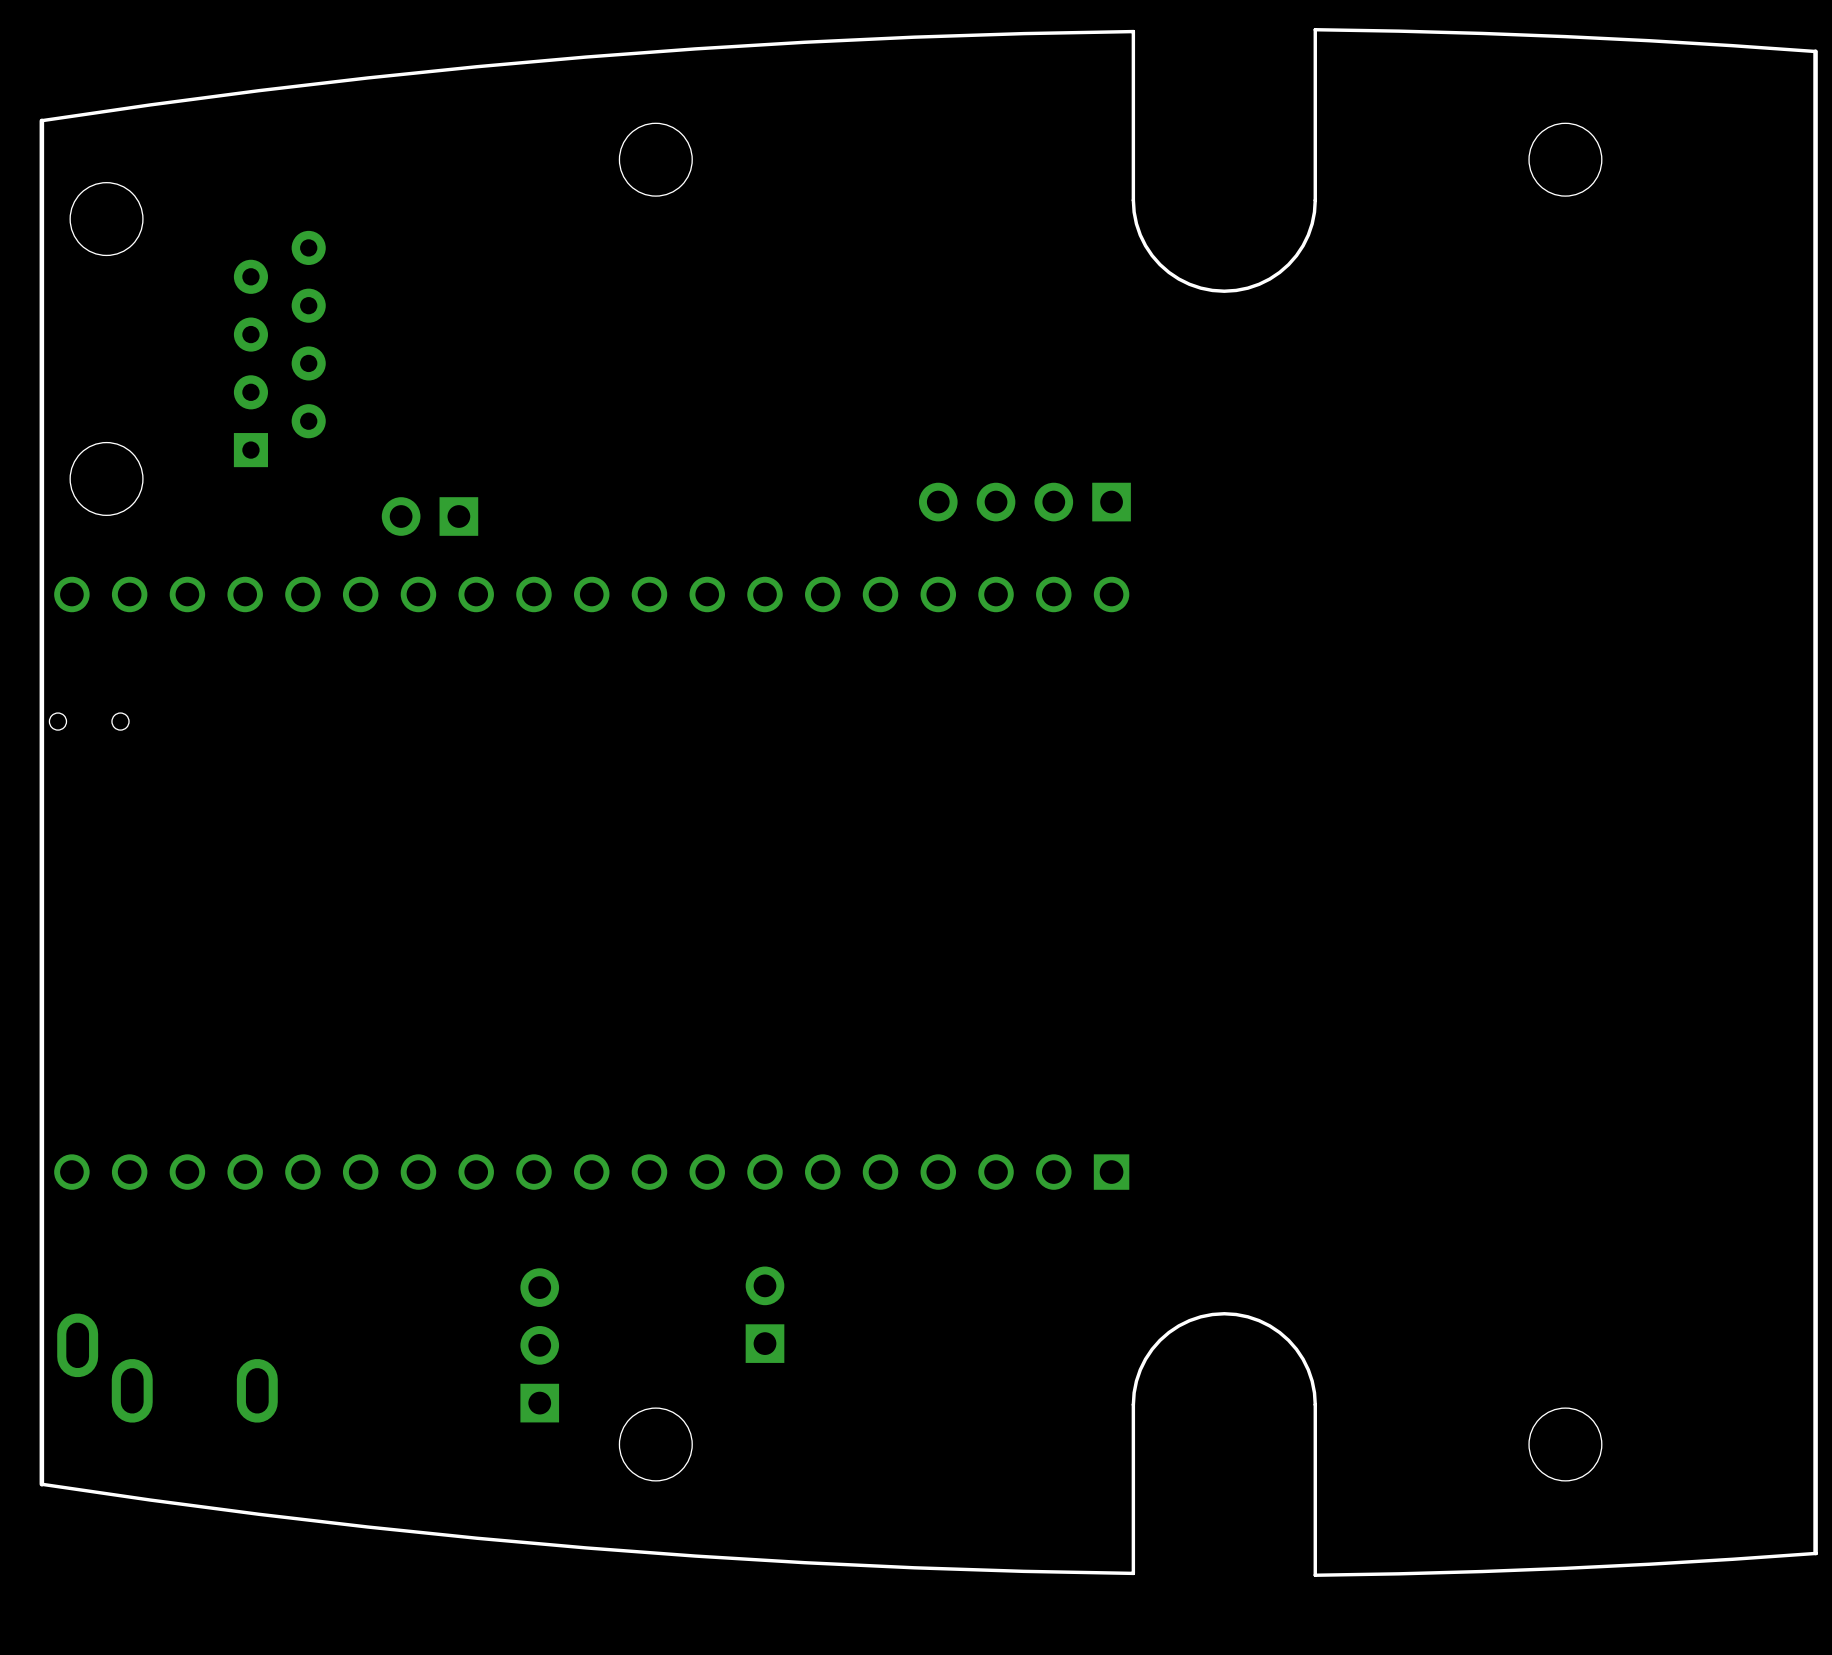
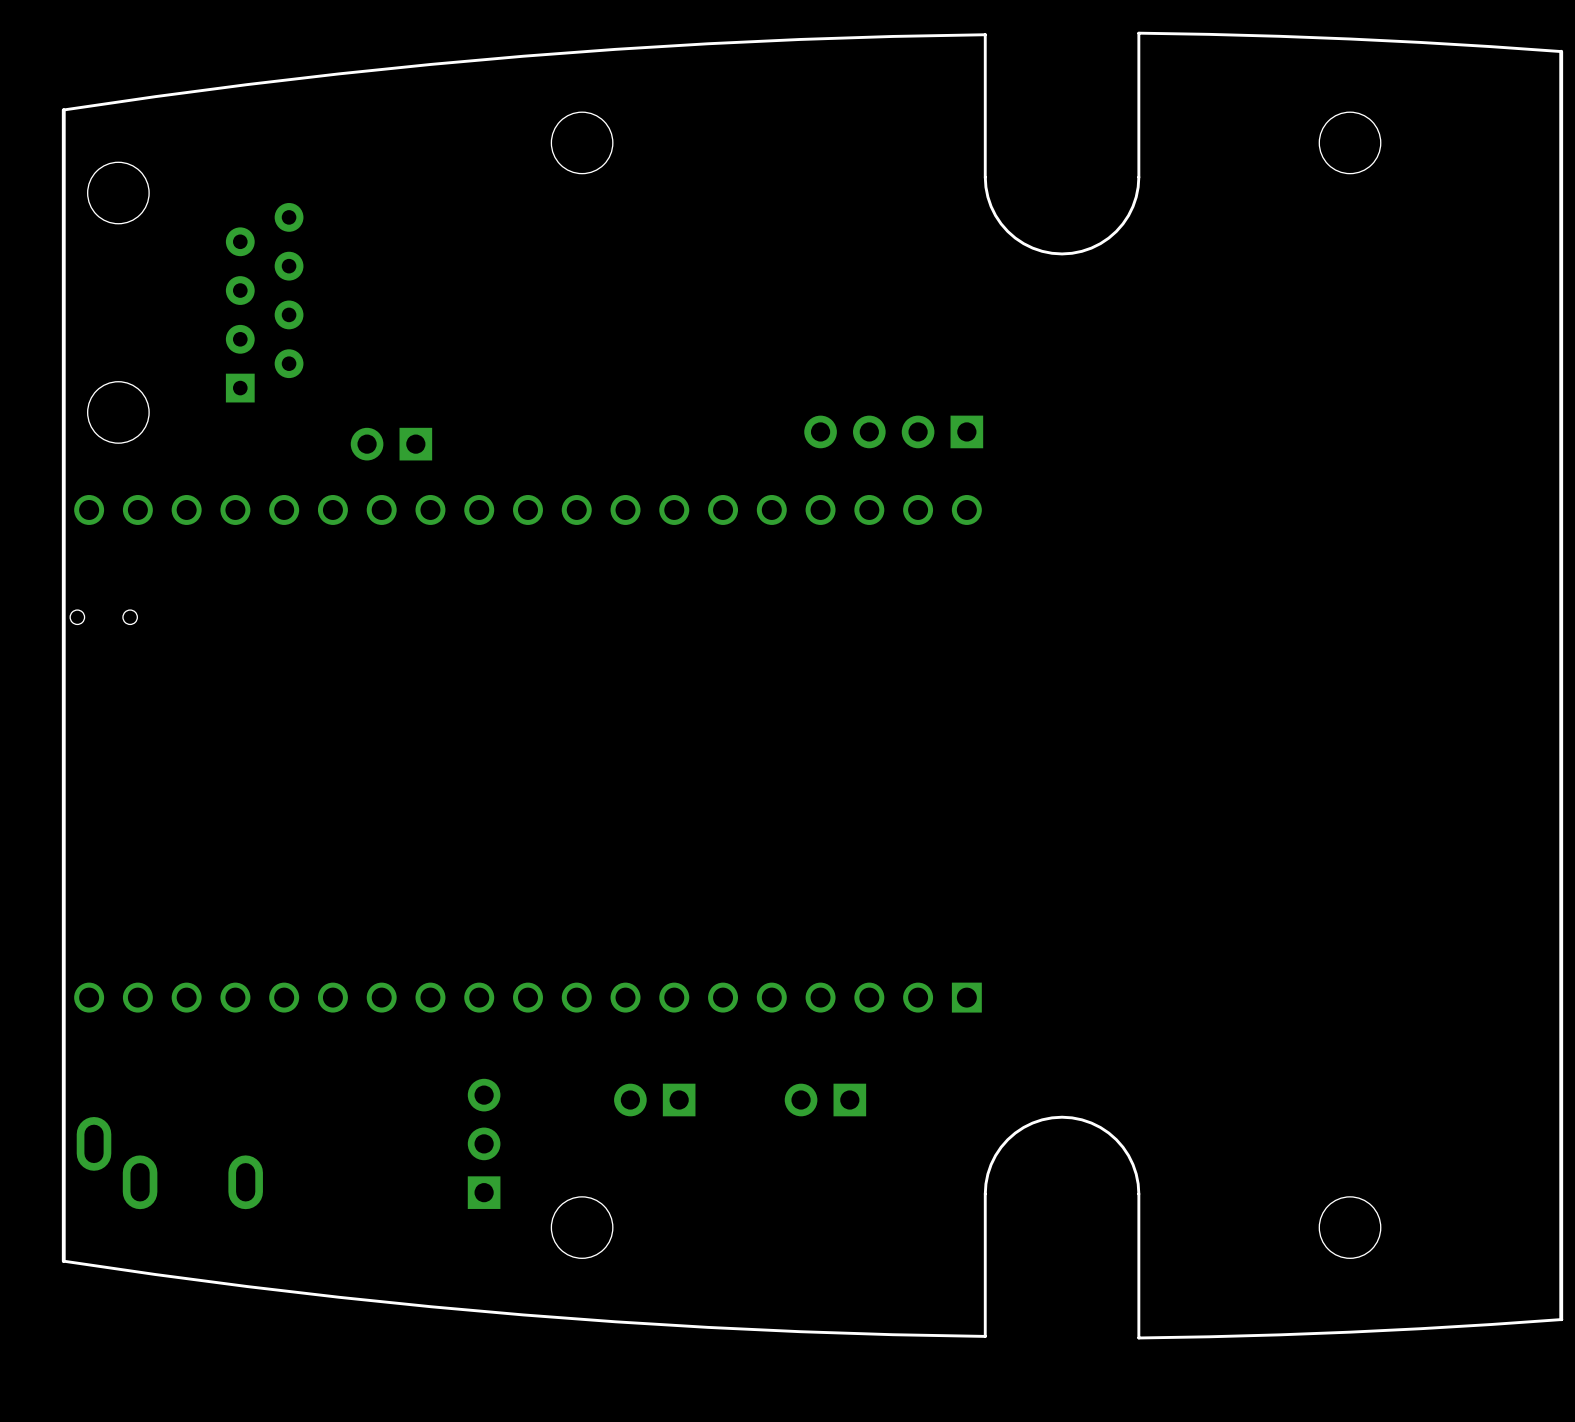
part: none -> (825, 1100)
part rotation: 0° (765, 1314) -> 90° counterclockwise (654, 1100)

